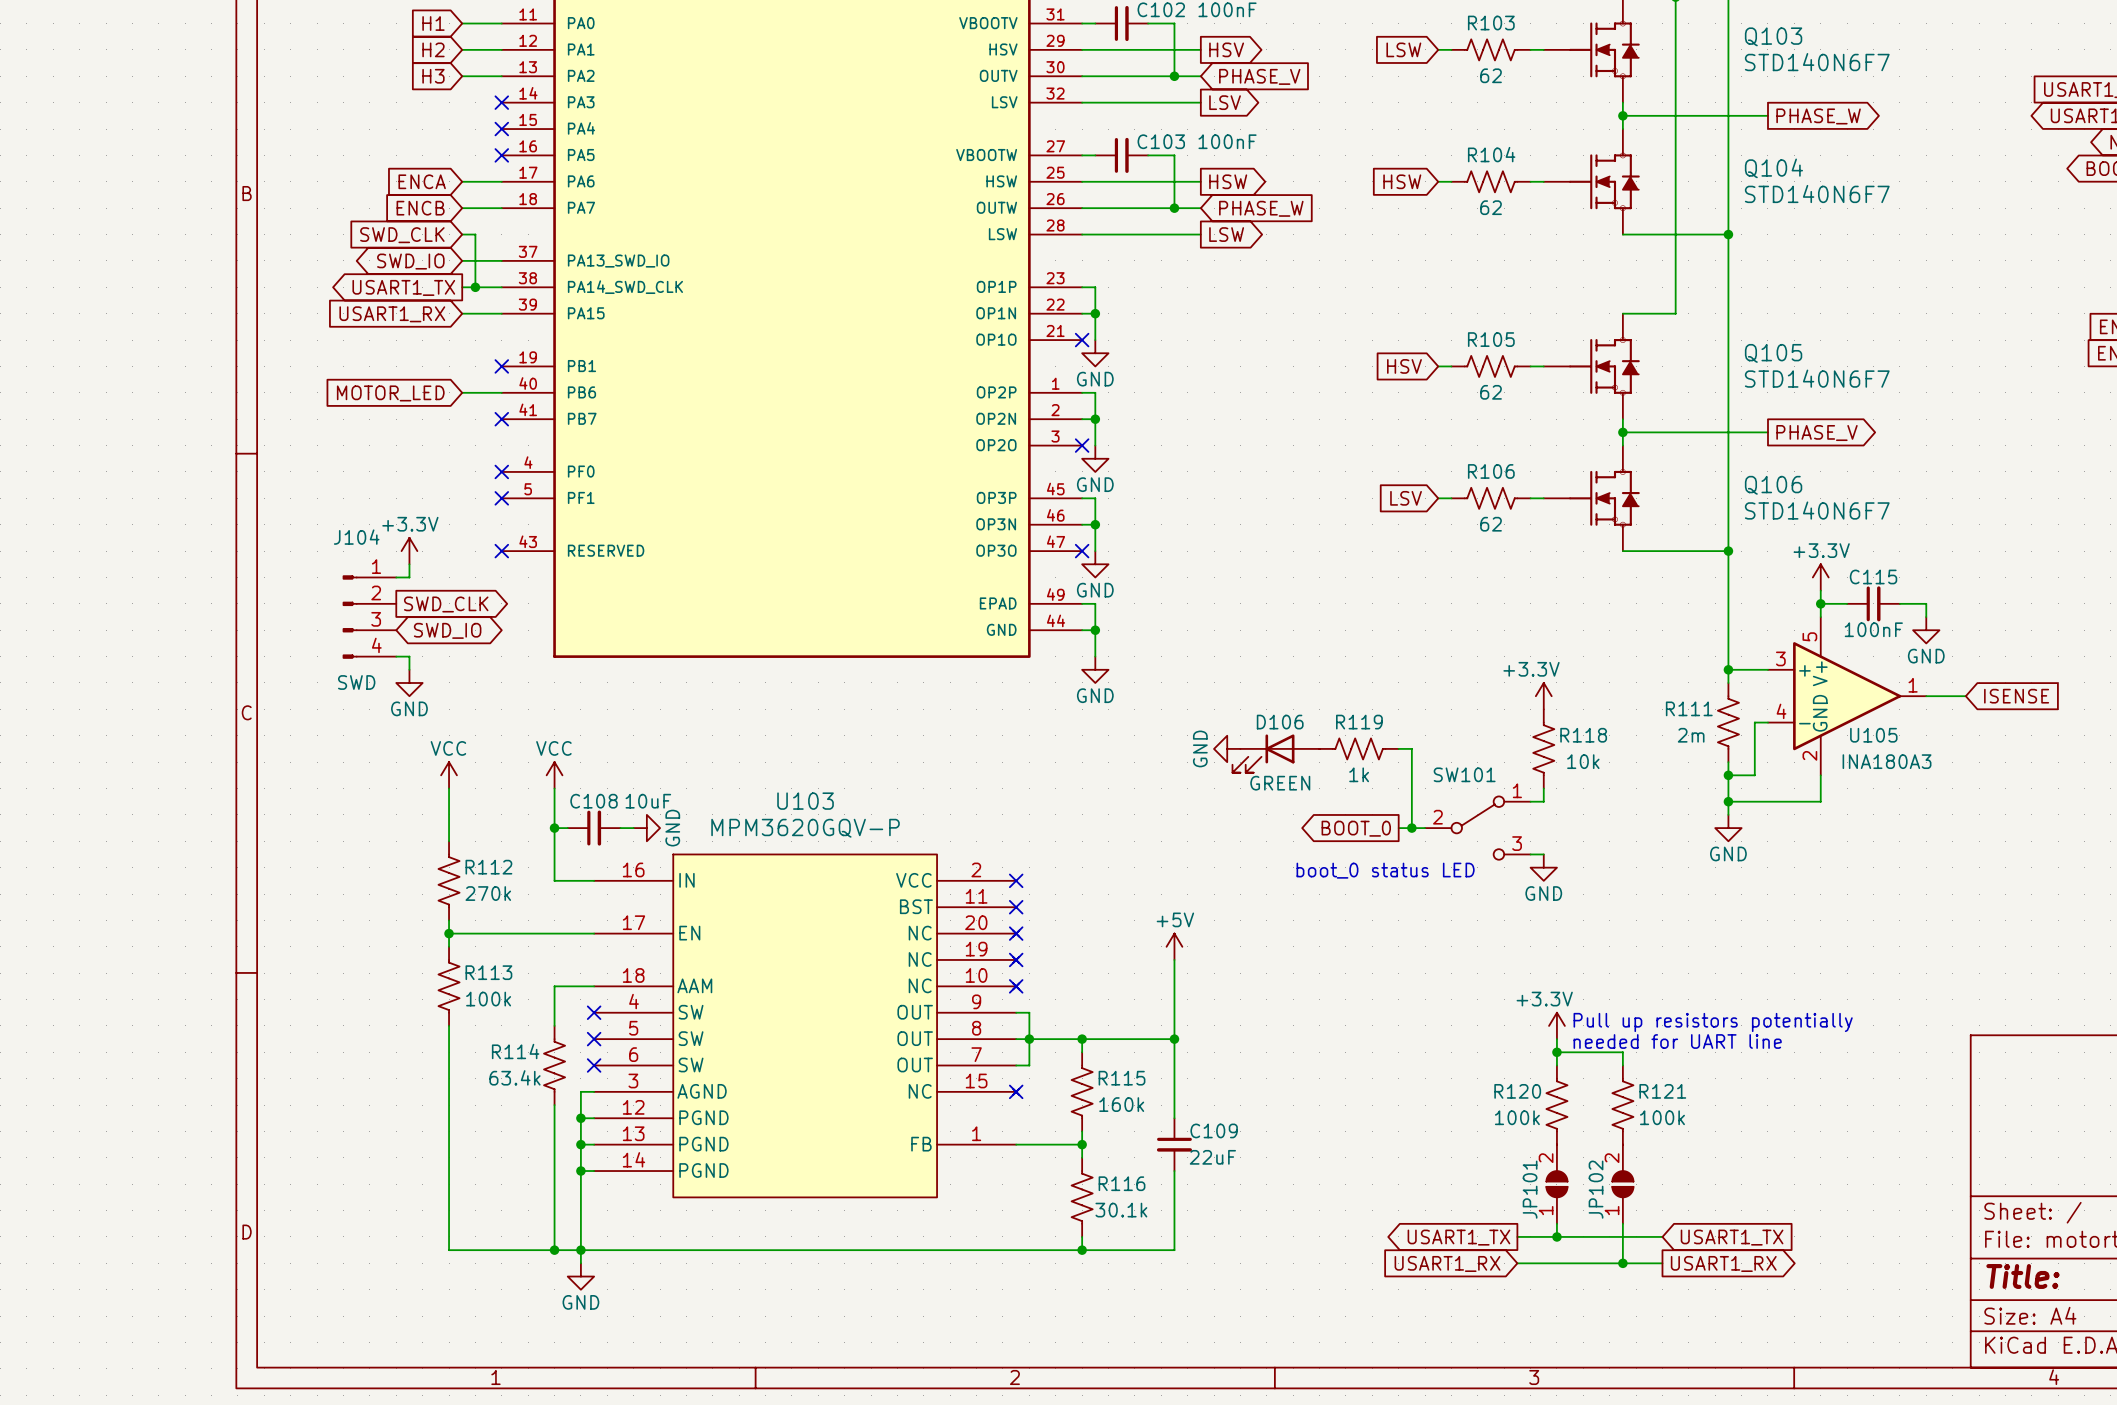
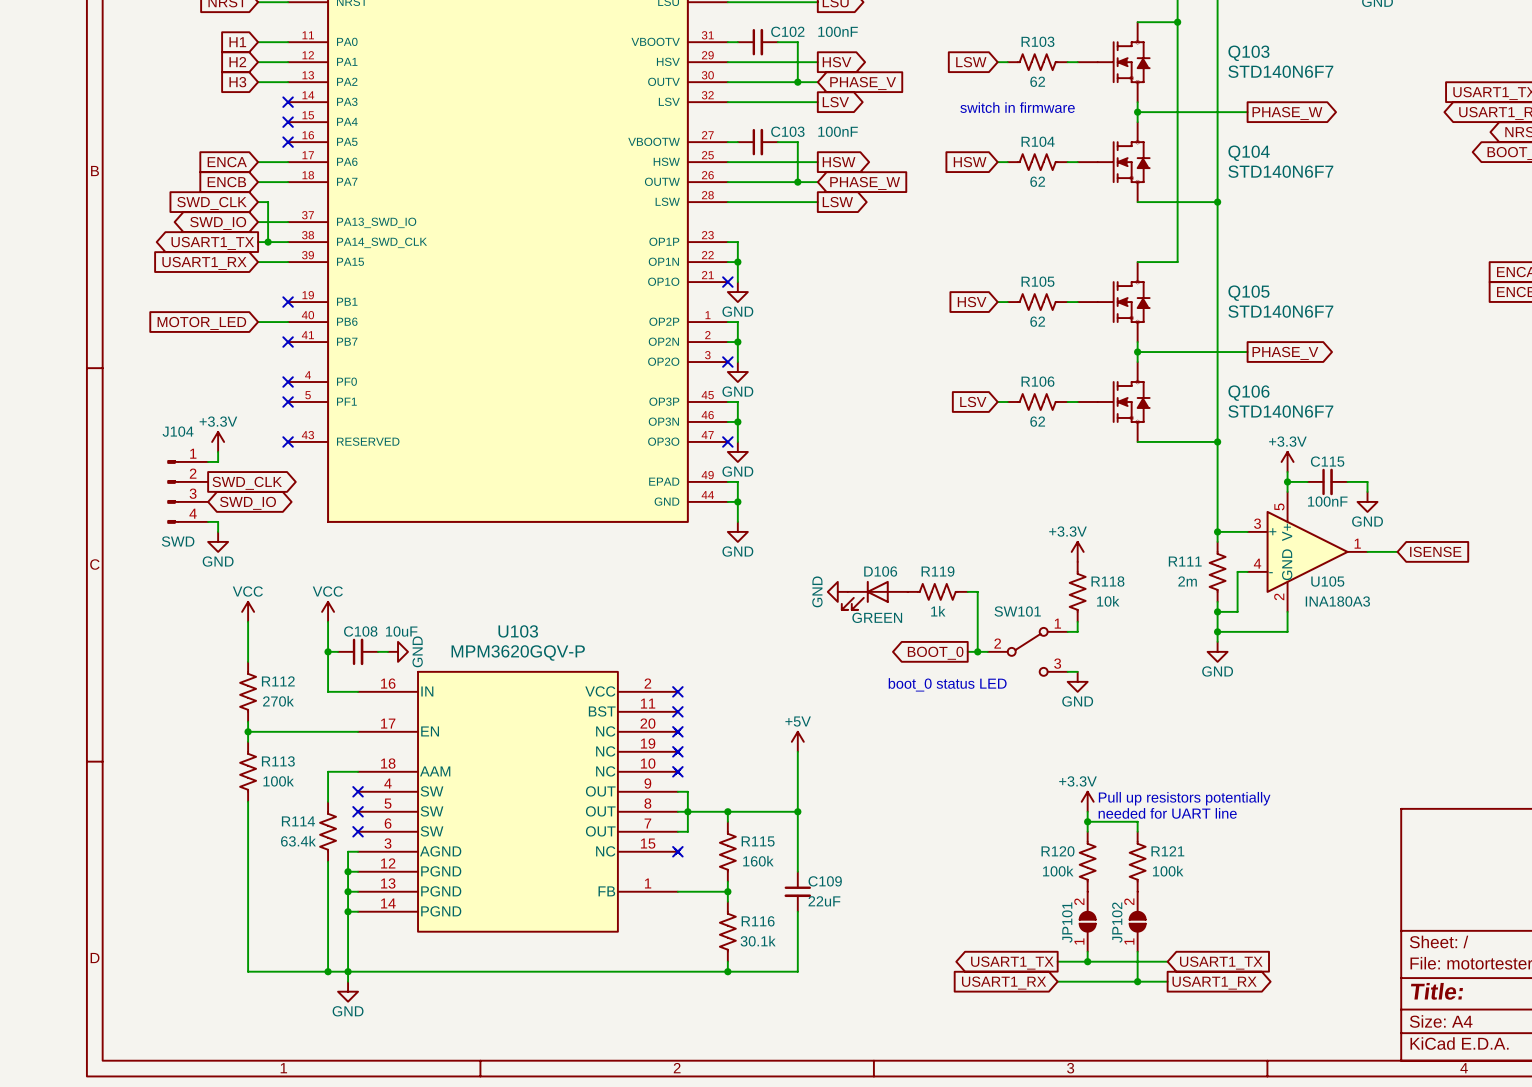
text: none -> switch in firmware (1017, 107)

